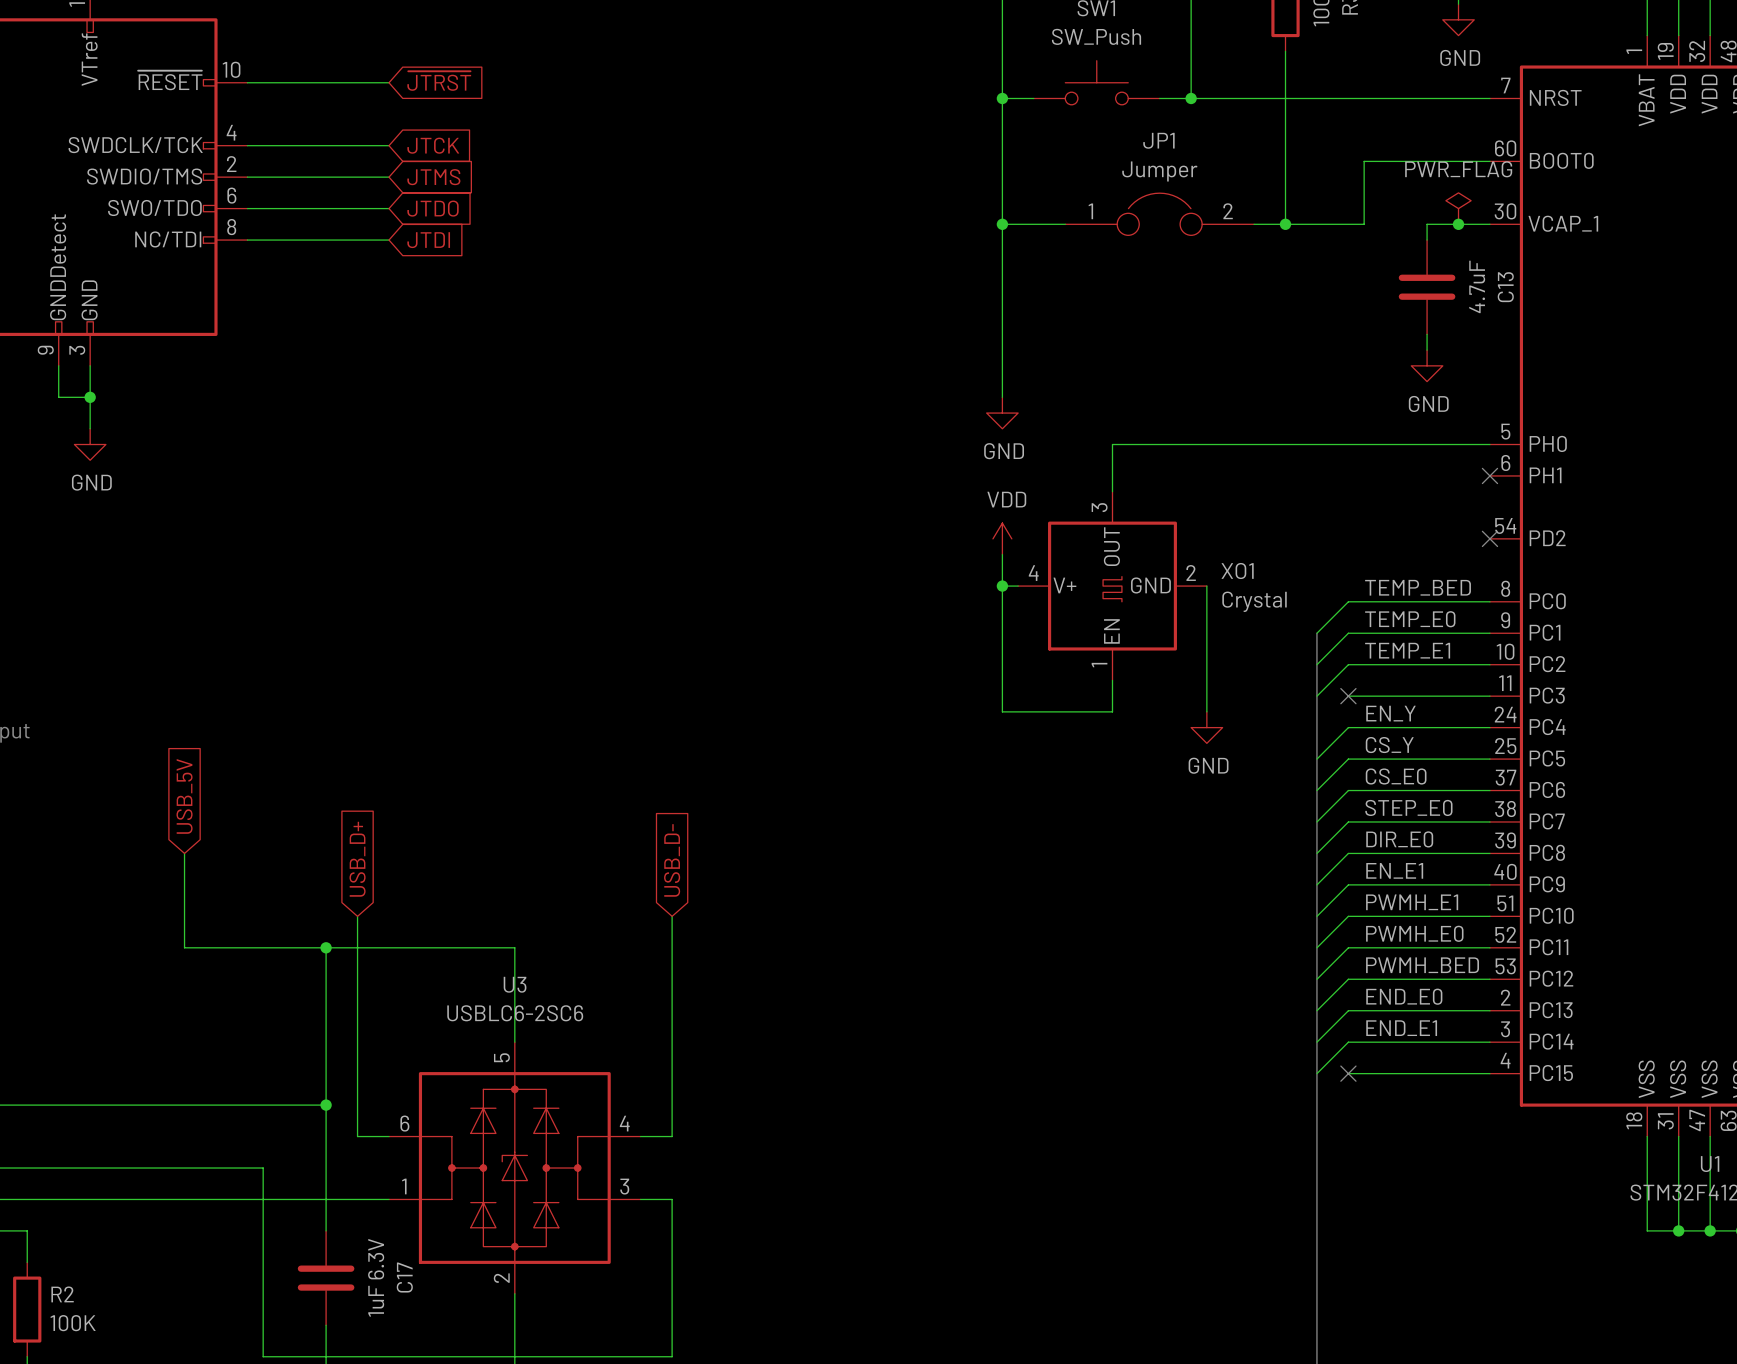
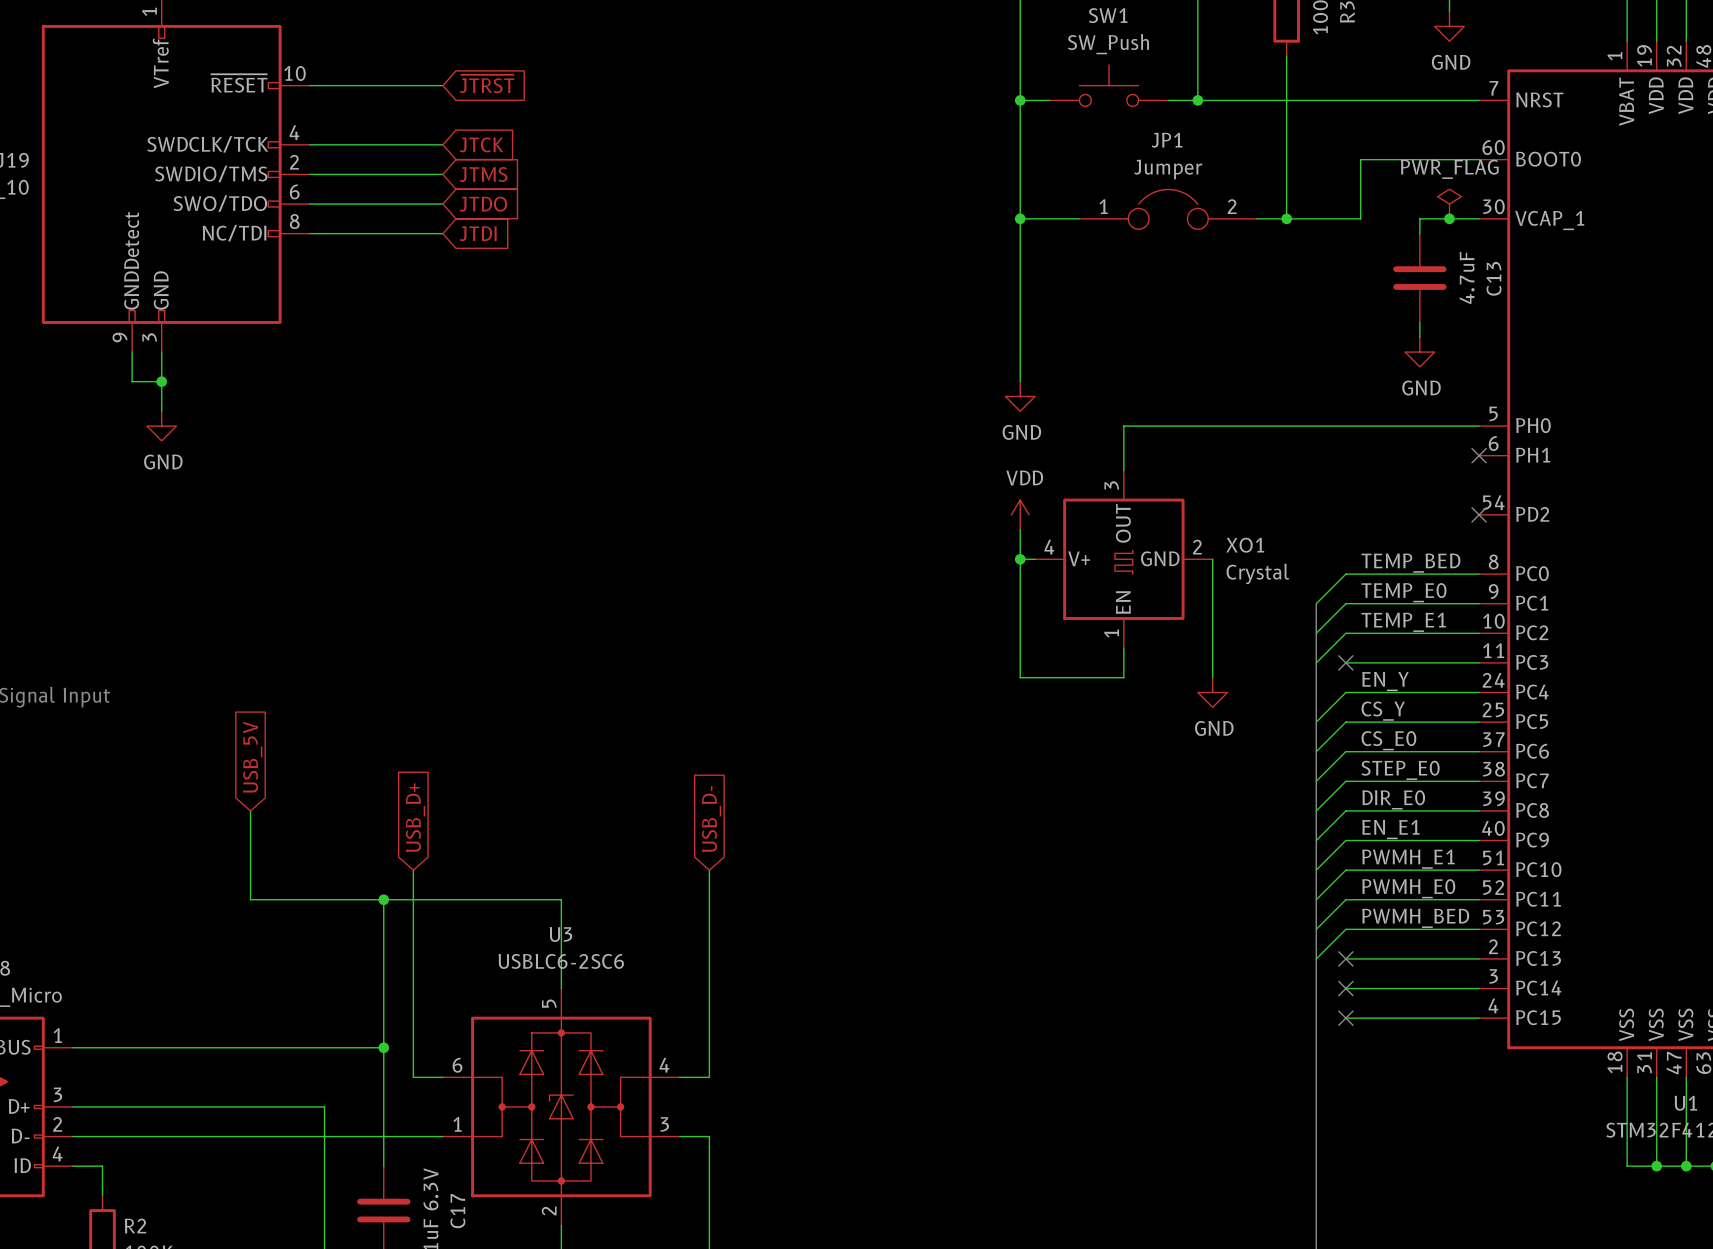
label: END_E0 (1404, 996) -> none
wire: (1348, 1010) (1316, 1042) -> none
no-connect mark: none -> (1345, 958)
label: END_E1 (1401, 1028) -> none
wire: (1348, 1042) (1316, 1073) -> none
no-connect mark: none -> (1345, 988)

